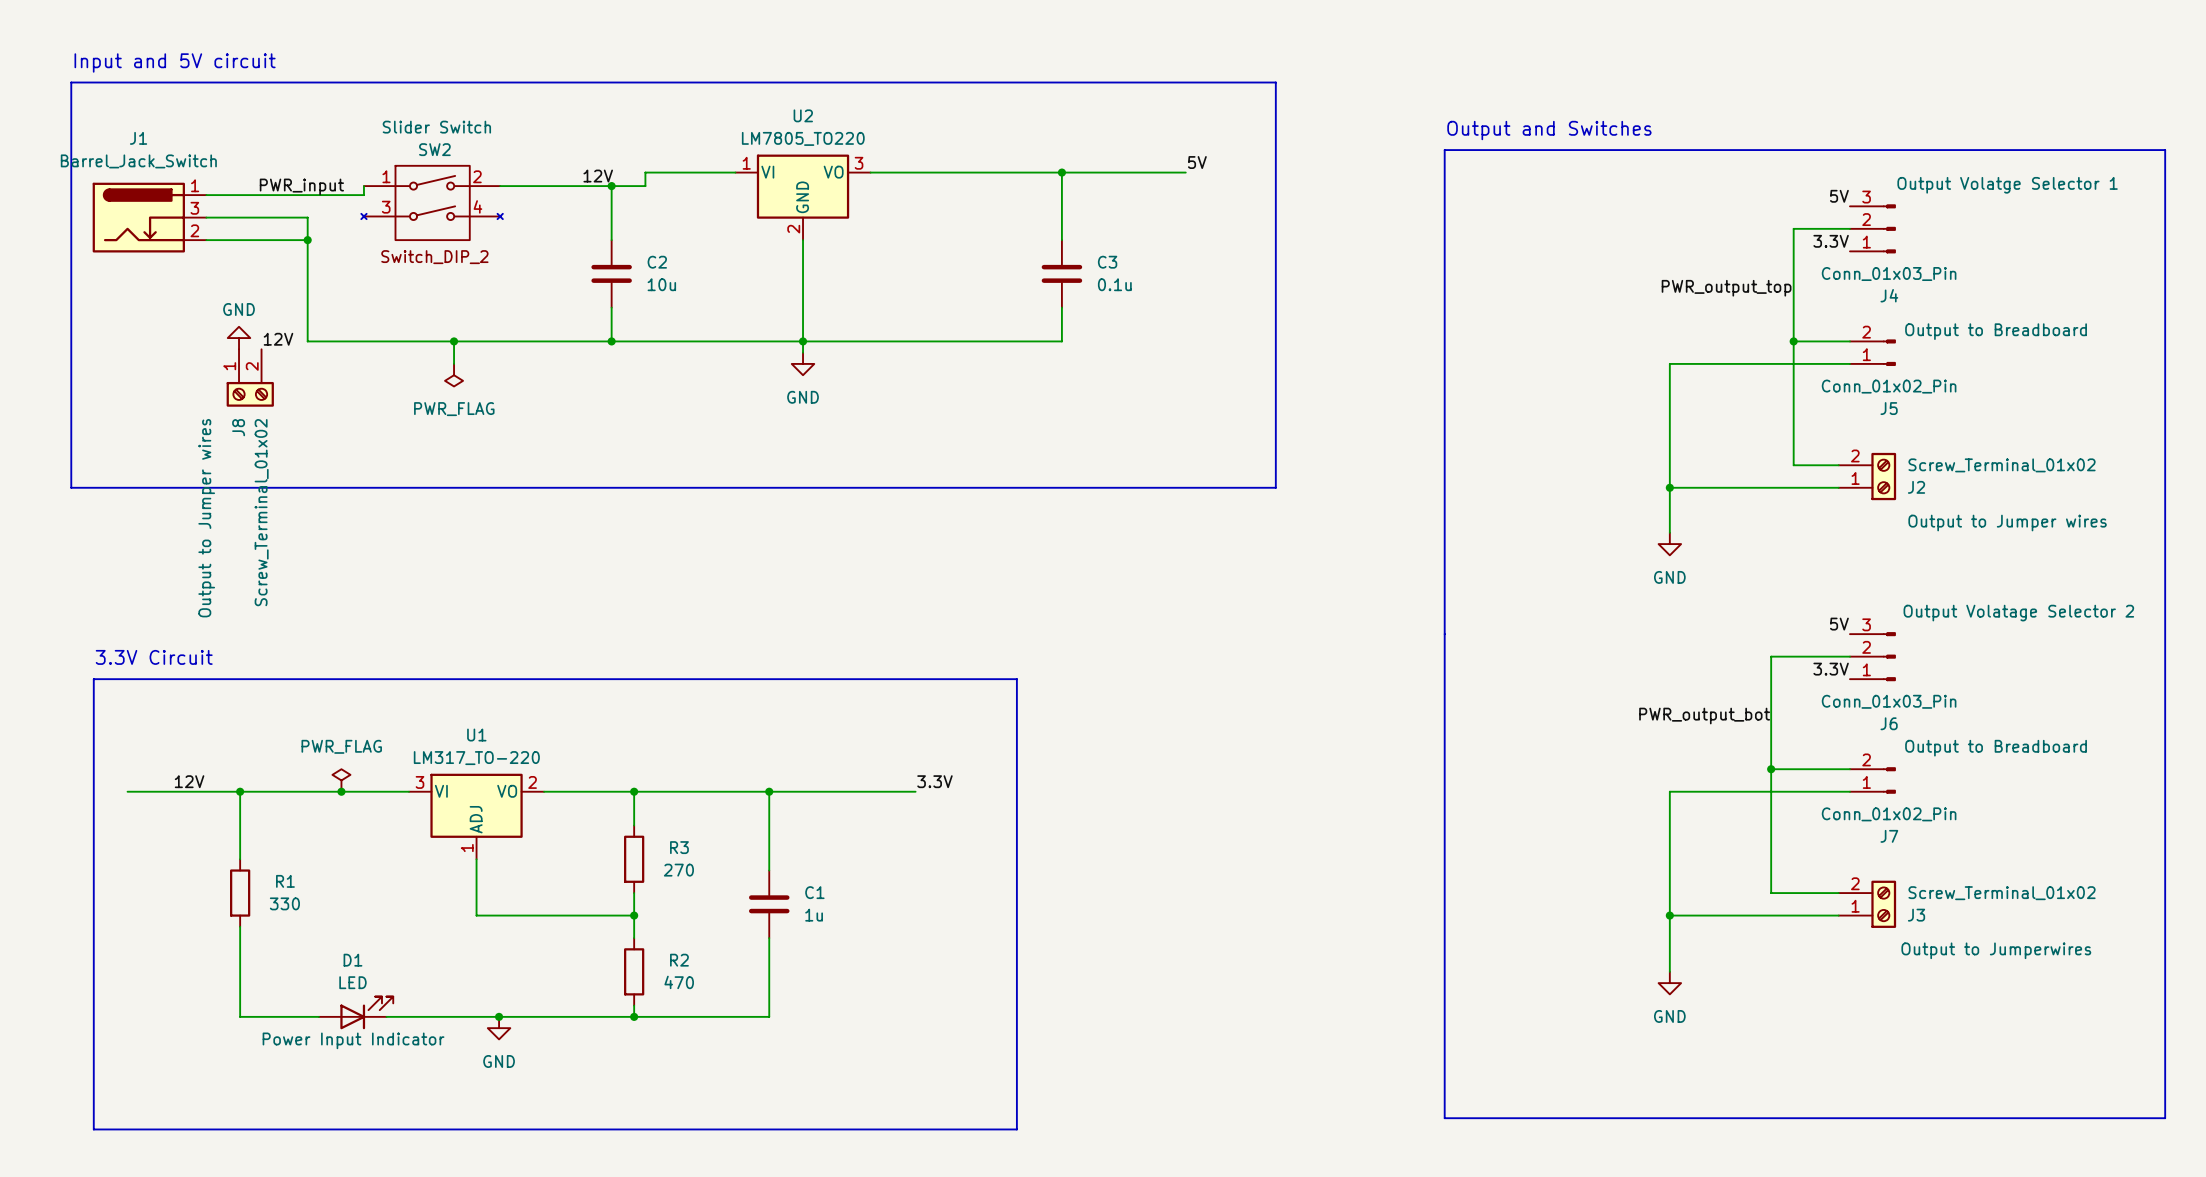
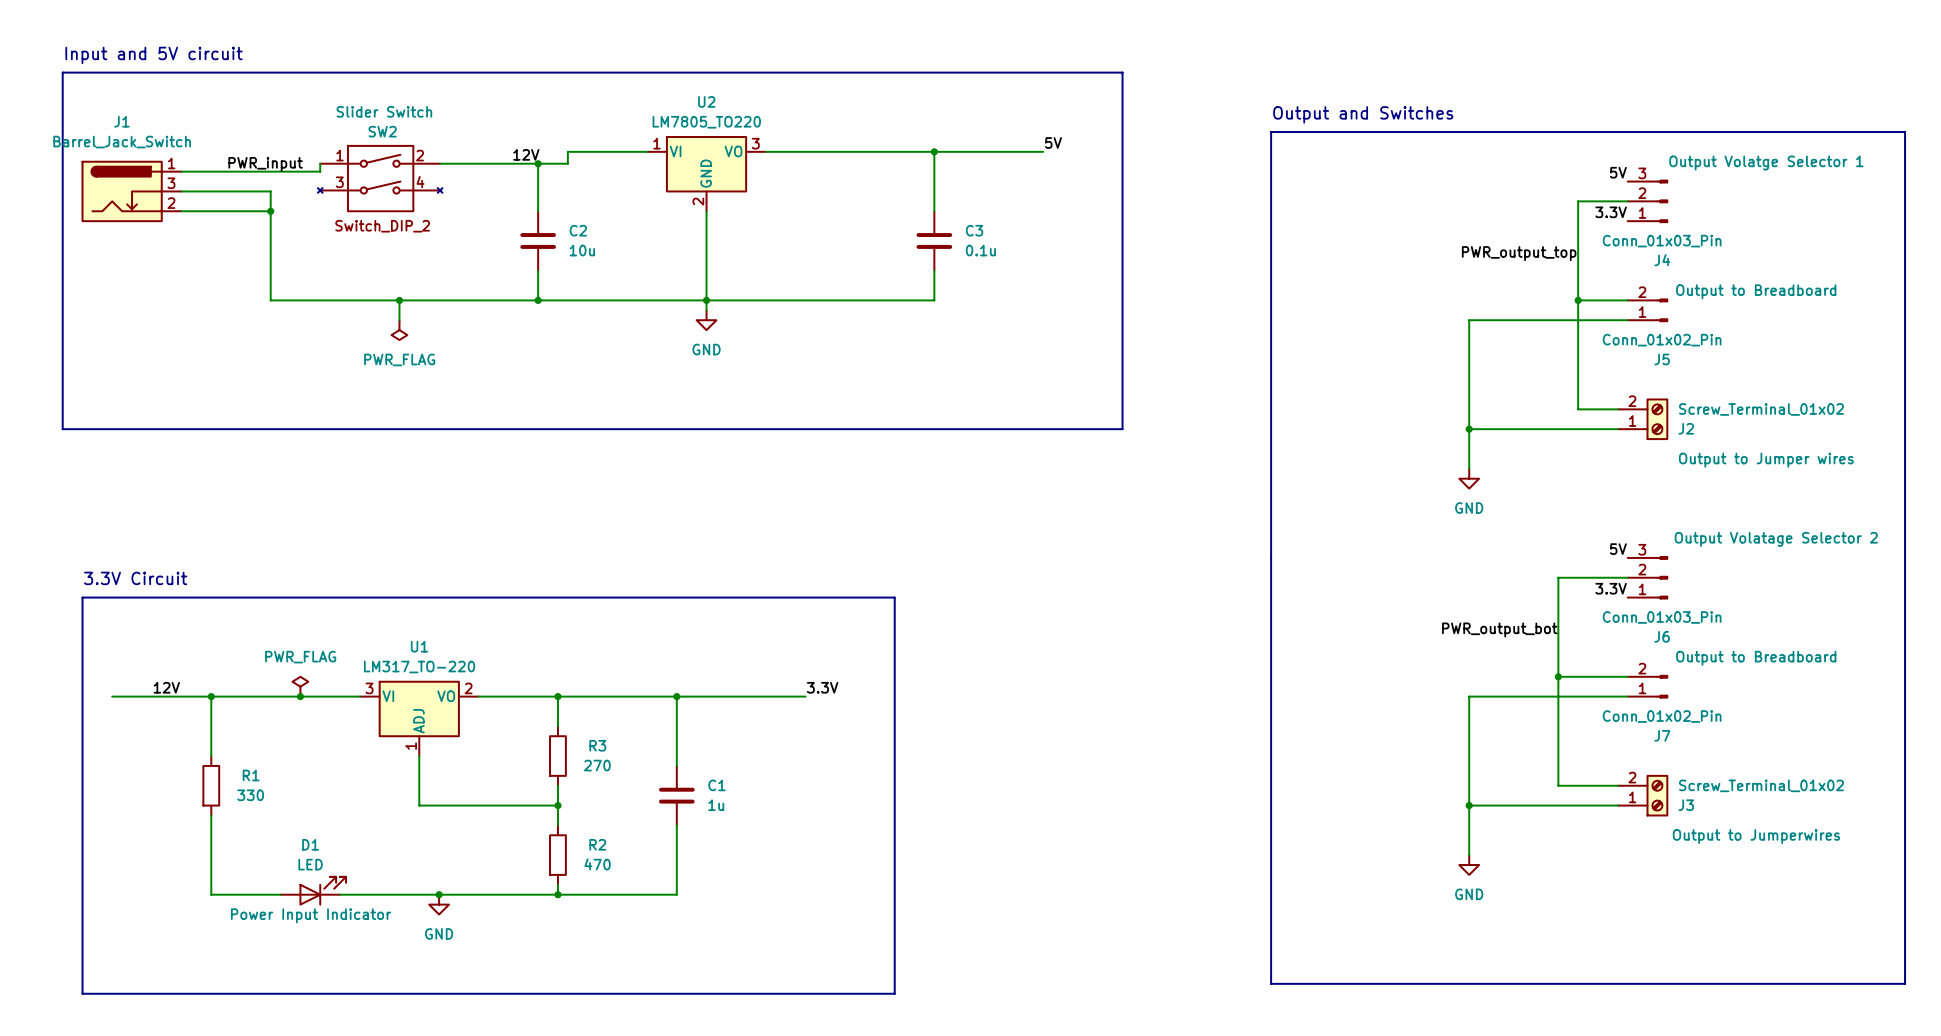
power symbol: GND (239, 338) -> none
label: 12V (278, 339) -> none
J8: Screw_Terminal_01x02 (250, 378) -> none

